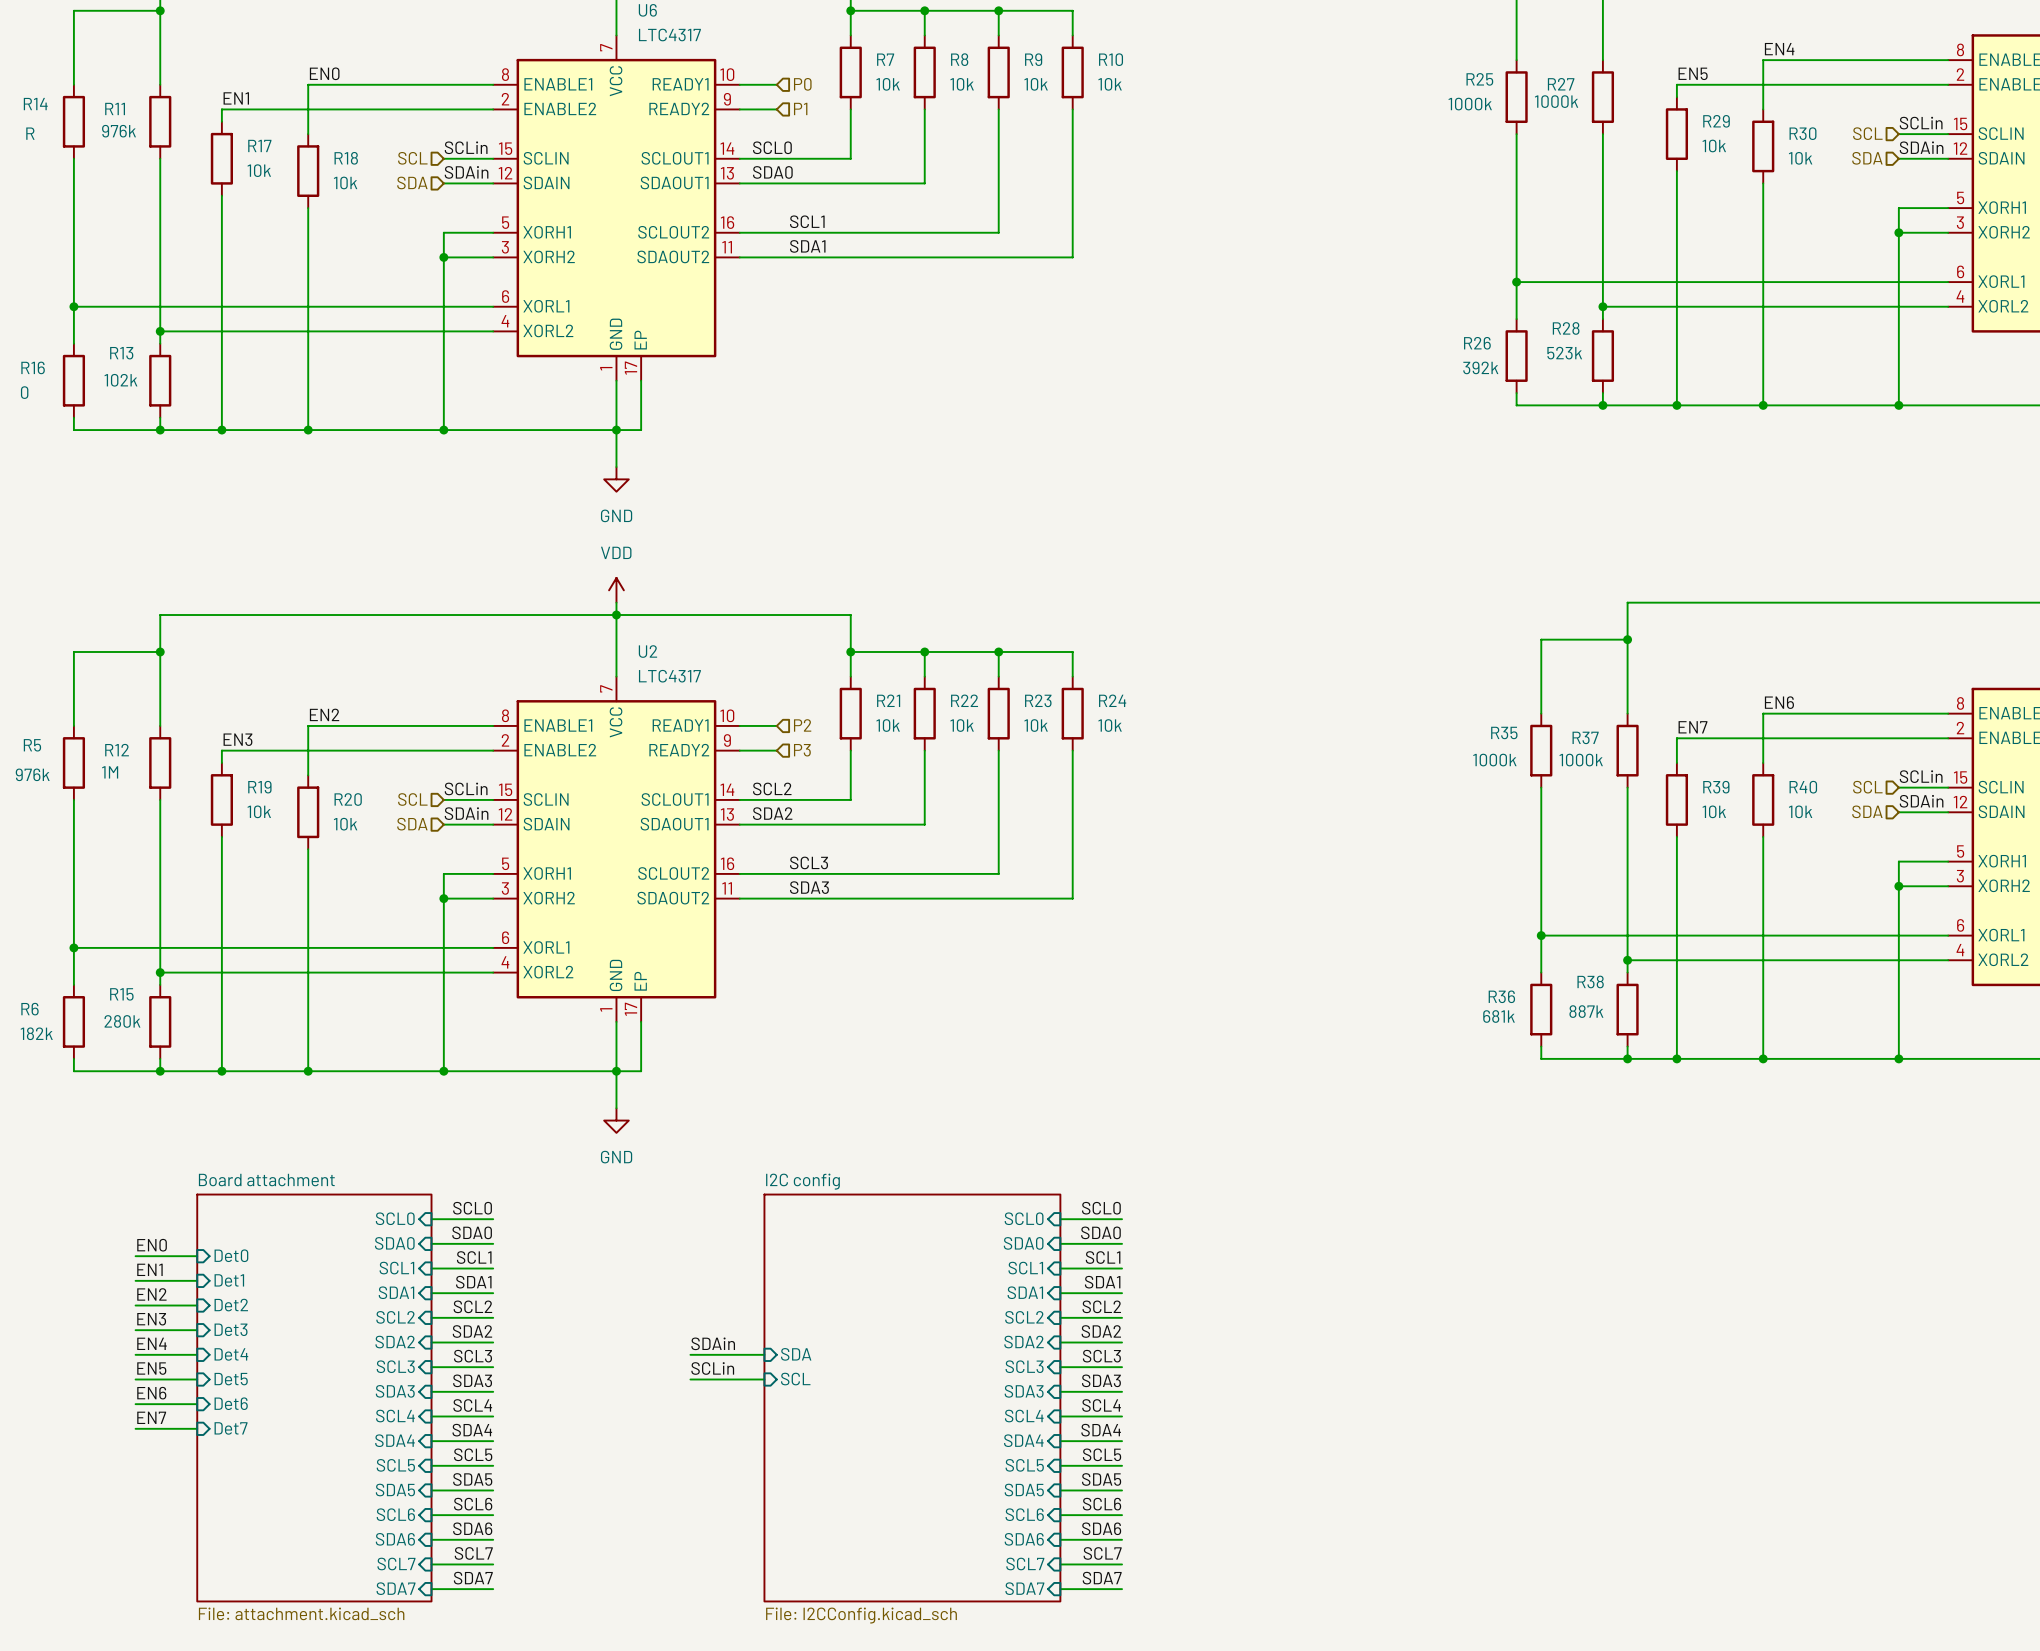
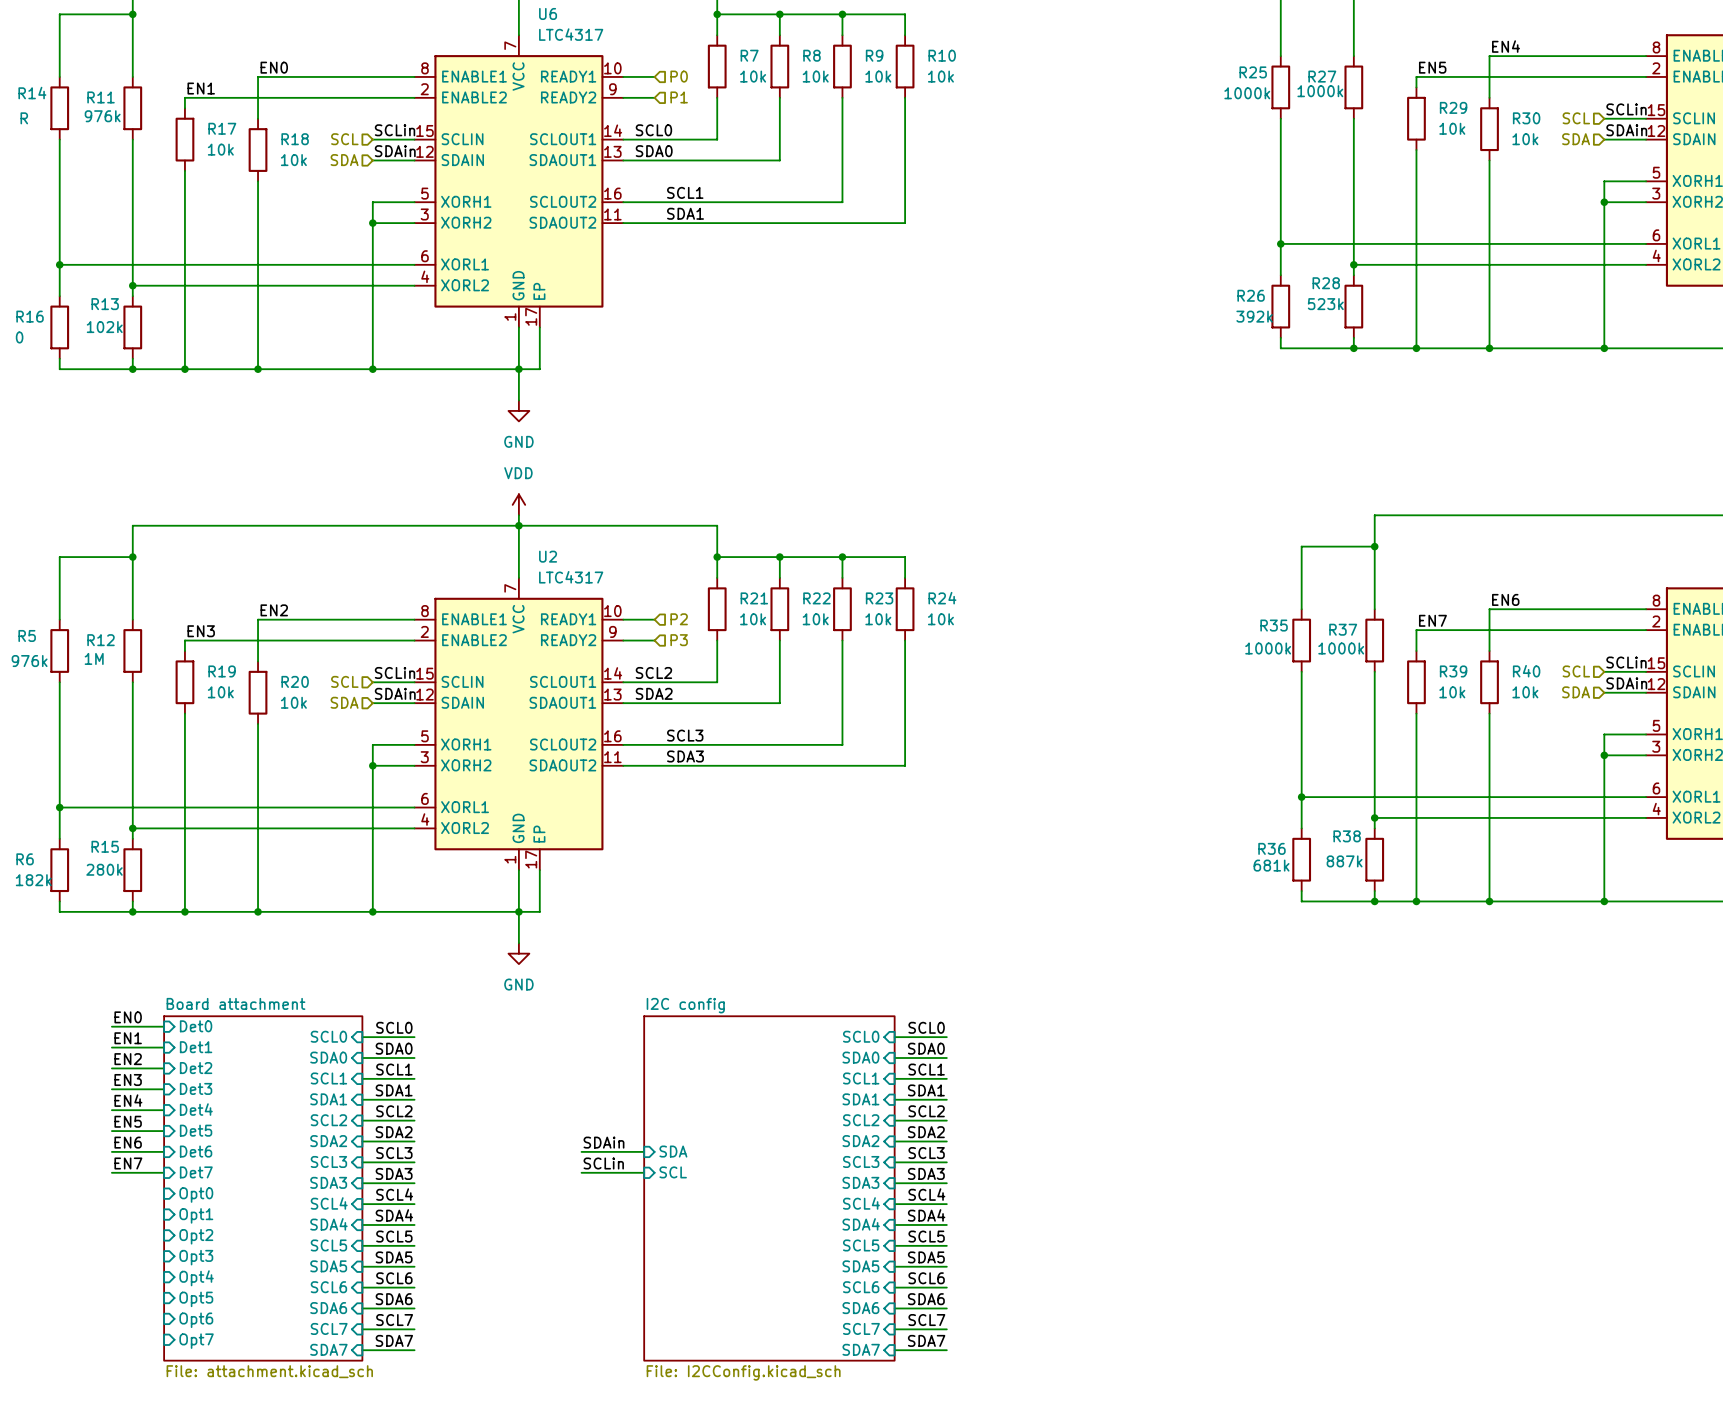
label: none -> EN0 (128, 1017)
sheet pin: none -> Det0 (196, 1026)
label: none -> EN1 (128, 1038)
sheet pin: none -> Det1 (196, 1047)
label: EN0 (152, 1245) -> EN2 (128, 1059)
sheet pin: Det0 (231, 1255) -> Det2 (196, 1068)
label: EN1 (149, 1269) -> EN3 (128, 1080)
sheet pin: Det1 (229, 1280) -> Det3 (196, 1088)
label: EN2 (151, 1294) -> EN4 (128, 1100)
sheet pin: Det2 (231, 1305) -> Det4 (196, 1109)
label: EN3 (151, 1319) -> EN5 (128, 1121)
sheet pin: Det3 (231, 1329) -> Det5 (196, 1130)
label: EN4 (152, 1343) -> EN6 (128, 1142)
sheet pin: Det4 (231, 1354) -> Det6 (196, 1151)
label: EN5 (151, 1368) -> EN7 (128, 1163)
sheet pin: Det5 (231, 1379) -> Det7 (196, 1172)
label: EN6 (151, 1393) -> none
sheet pin: Det6 (231, 1403) -> Opt0 (196, 1195)
wire: (135, 1404) (197, 1404) -> (111, 1026) (164, 1026)
label: EN7 (151, 1417) -> none
wire: (135, 1428) (197, 1428) -> (111, 1047) (164, 1047)
sheet pin: Det7 (231, 1428) -> Opt1 (196, 1215)
sheet pin: none -> Opt2 (196, 1236)
sheet pin: none -> Opt3 (196, 1257)
sheet pin: none -> Opt4 (196, 1278)
sheet pin: none -> Opt5 (196, 1299)
sheet pin: none -> Opt6 (196, 1320)
sheet pin: none -> Opt7 (196, 1341)

